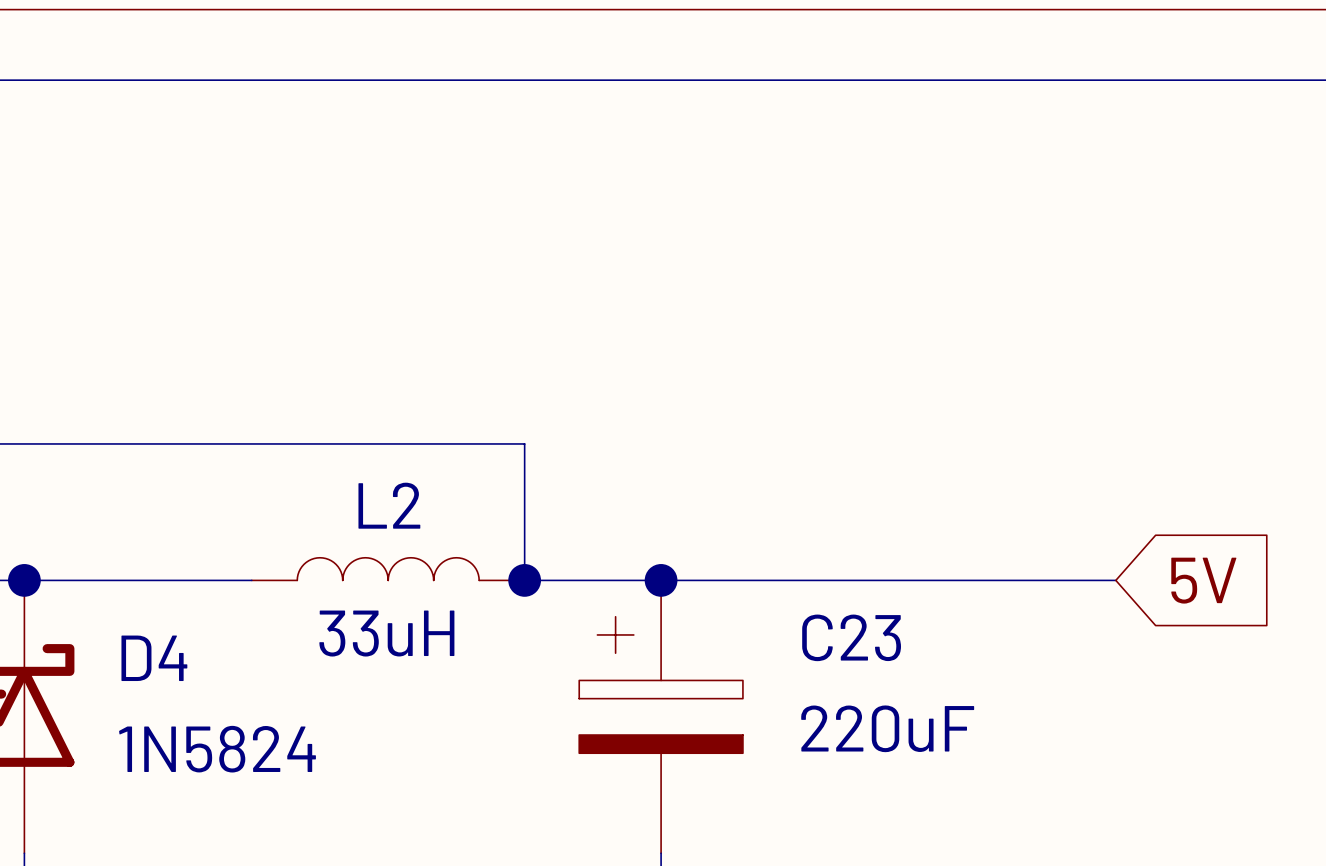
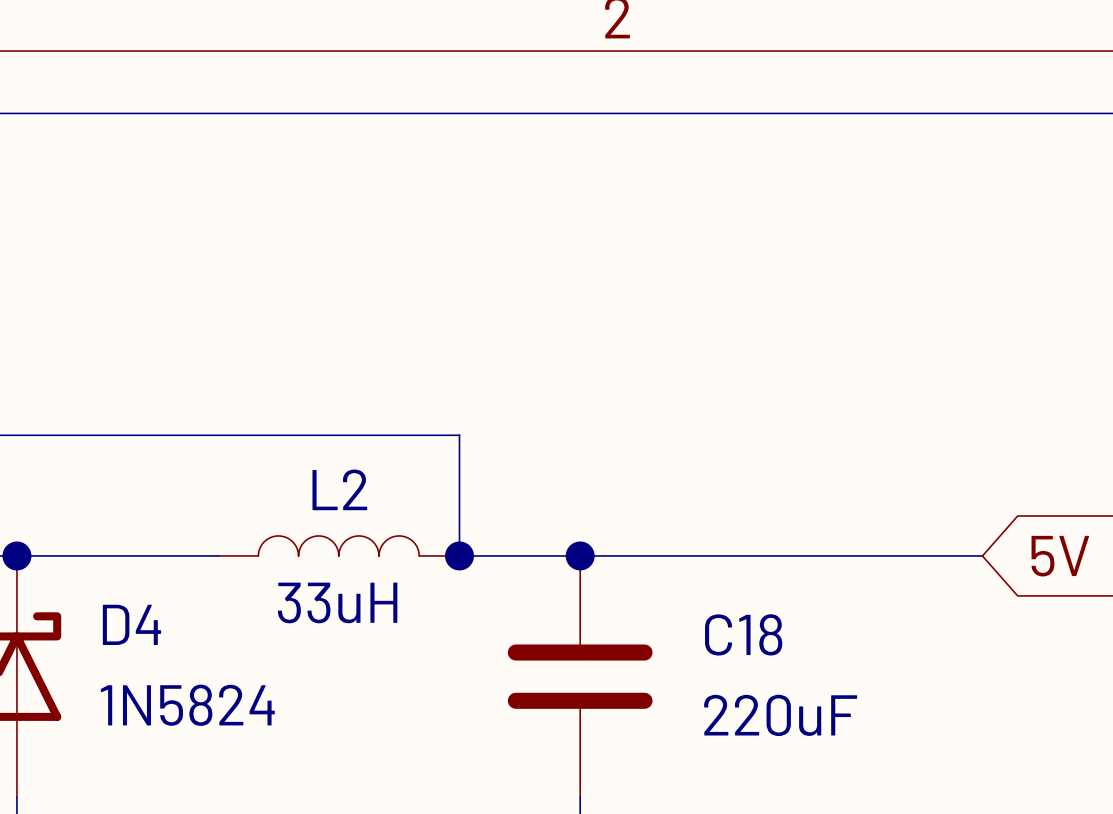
C23: 220uF (661, 716) -> none
C18: none -> 220uF (580, 676)

